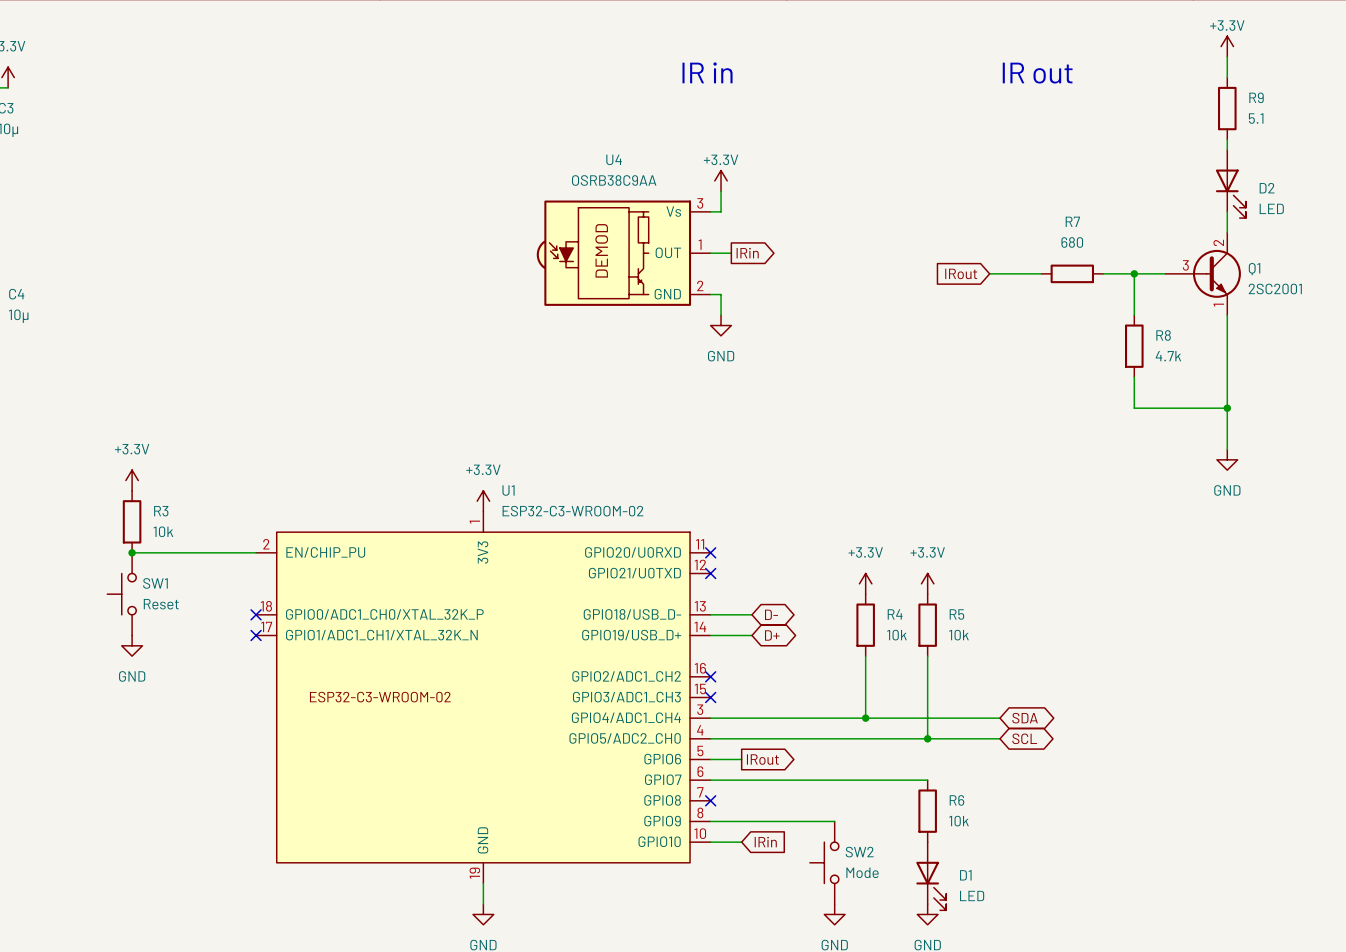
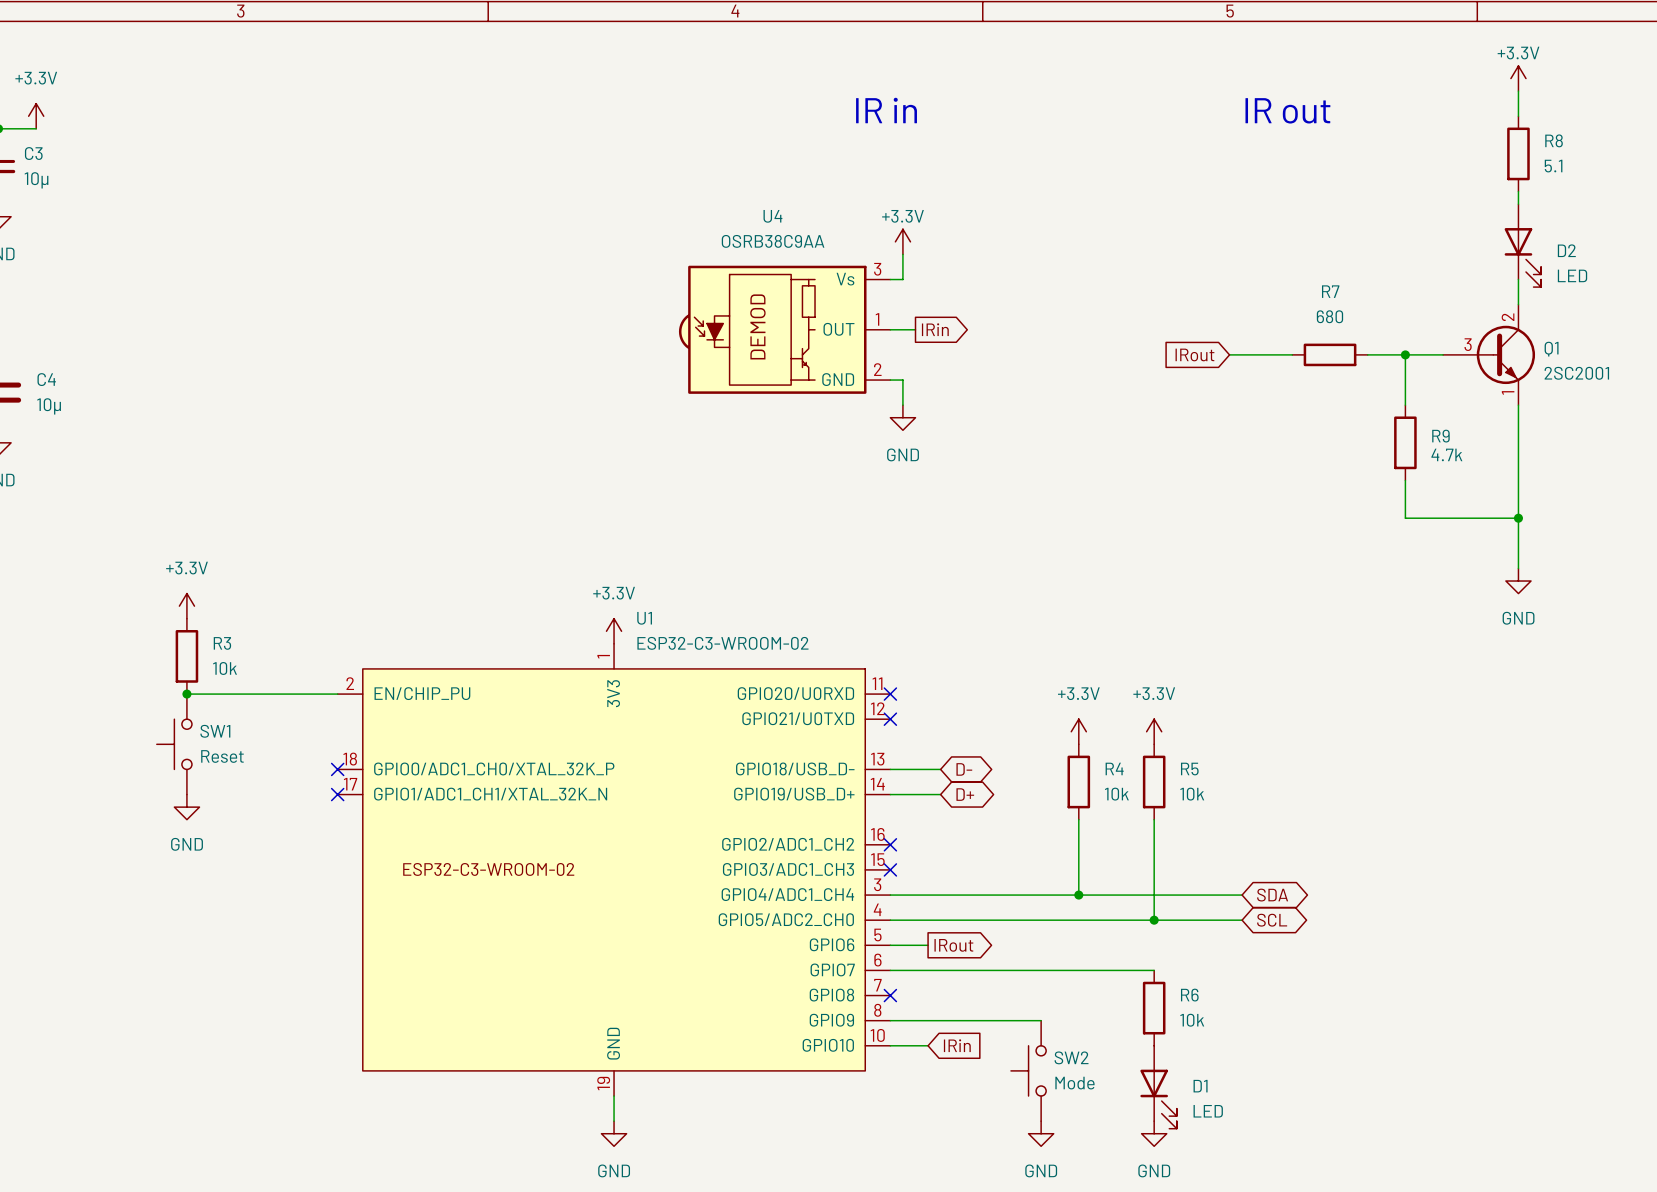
R9 name: R9 (1256, 97) -> R8 (1554, 140)
R8 name: R8 (1163, 335) -> R9 (1440, 436)

